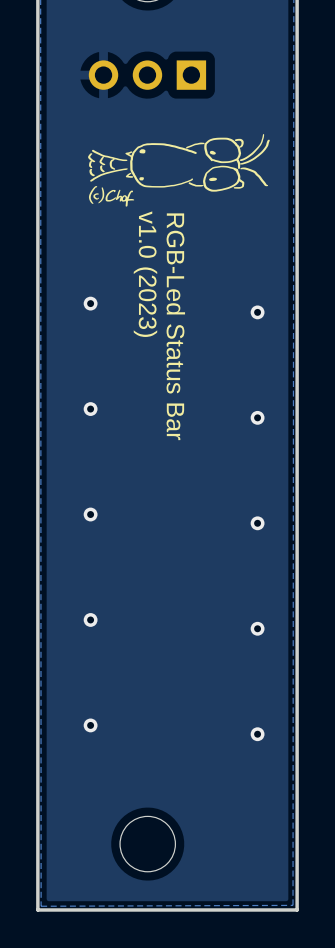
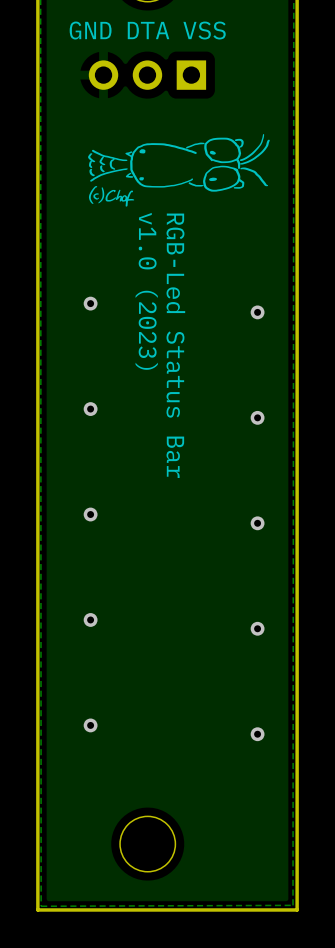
text: none -> GND (90, 30)
text: none -> DTA (148, 30)
text: none -> VSS (204, 30)

